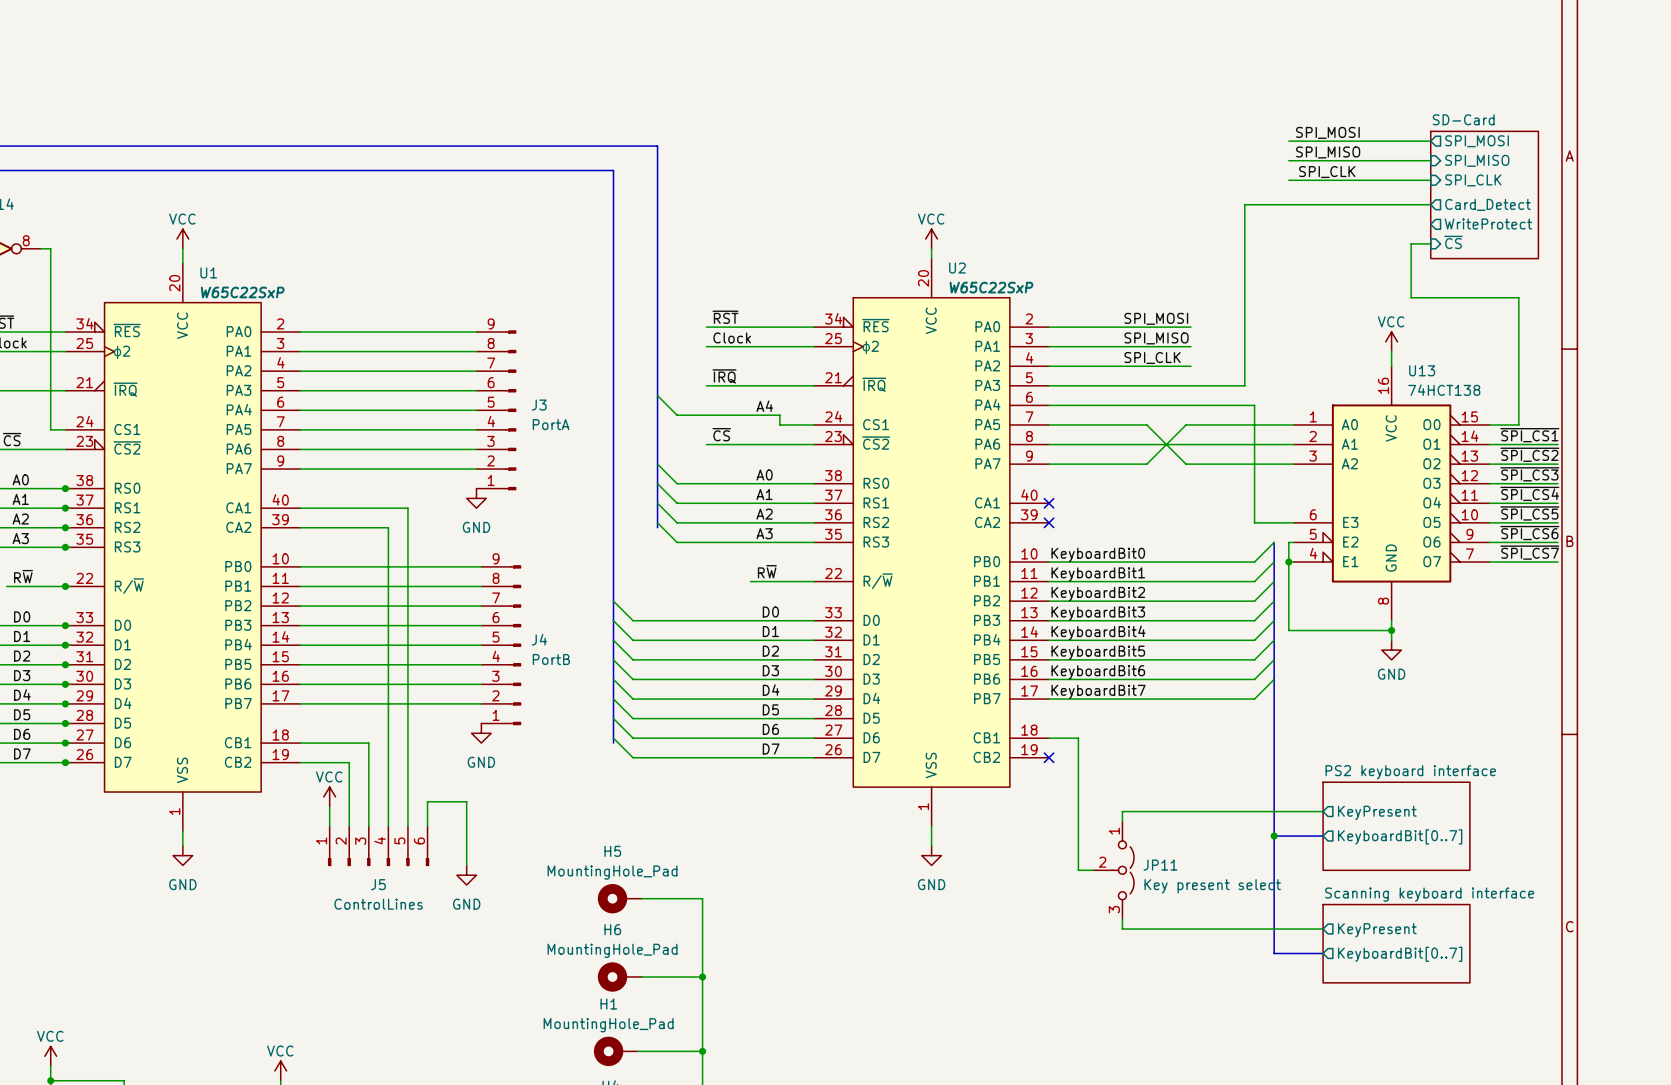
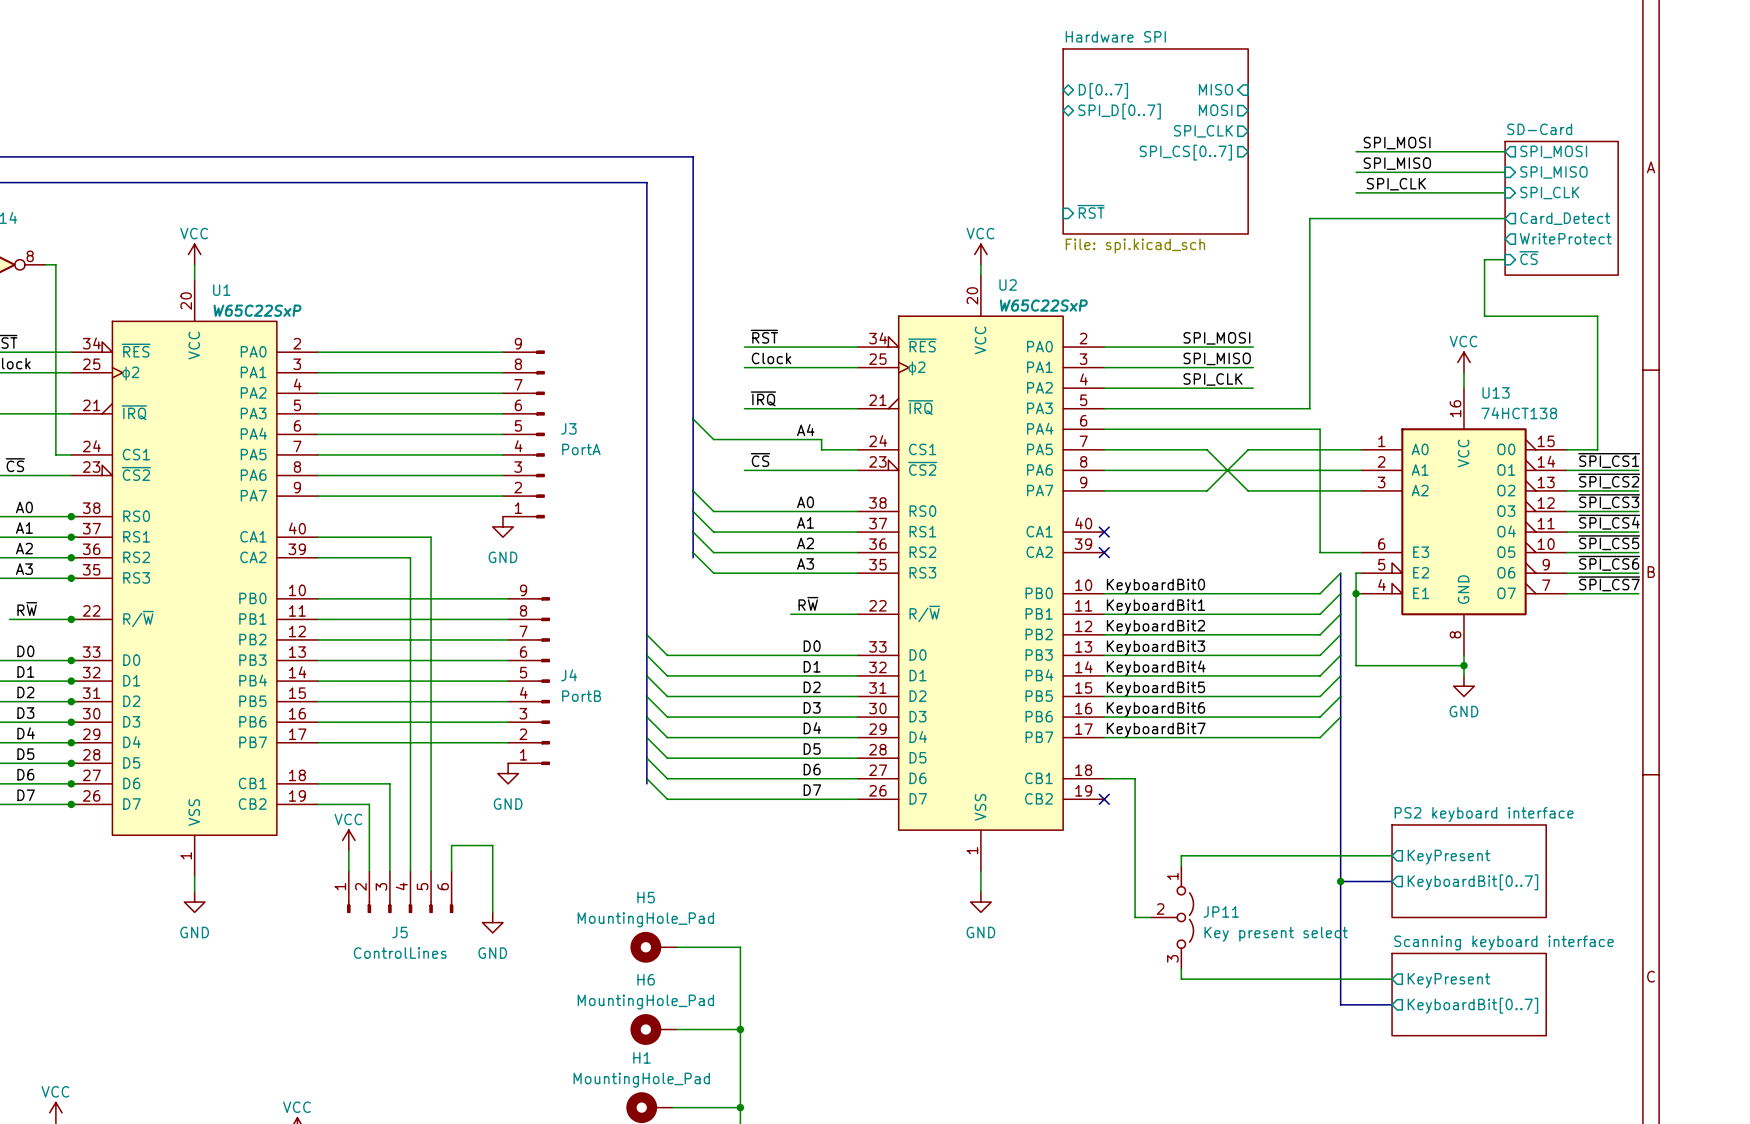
sheet pin: none -> MISO (1215, 89)
sheet pin: none -> D[0..7] (1103, 90)
sheet pin: none -> MOSI (1215, 110)
sheet pin: none -> SPI_D[0..7] (1119, 111)
sheet pin: none -> SPI_CLK (1203, 131)
sheet Hardware SPI: none -> File: spi.kicad_sch (1155, 141)
sheet pin: none -> SPI_CS[0..7] (1185, 152)
sheet pin: none -> ~{RST} (1090, 211)

